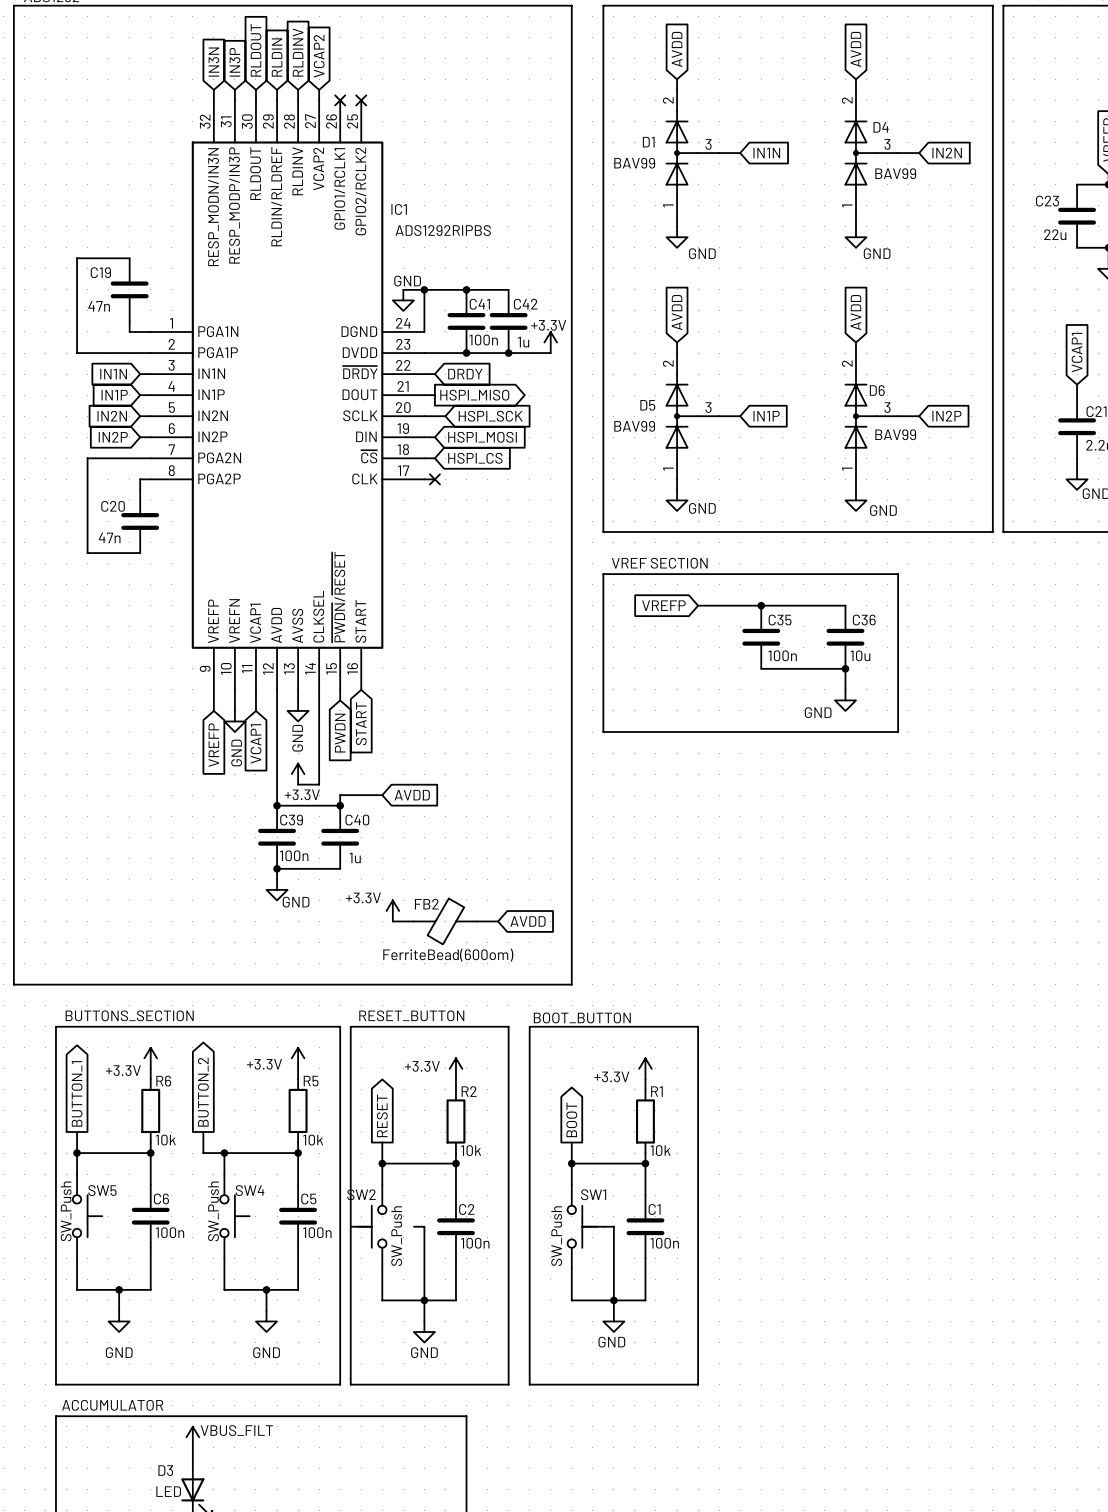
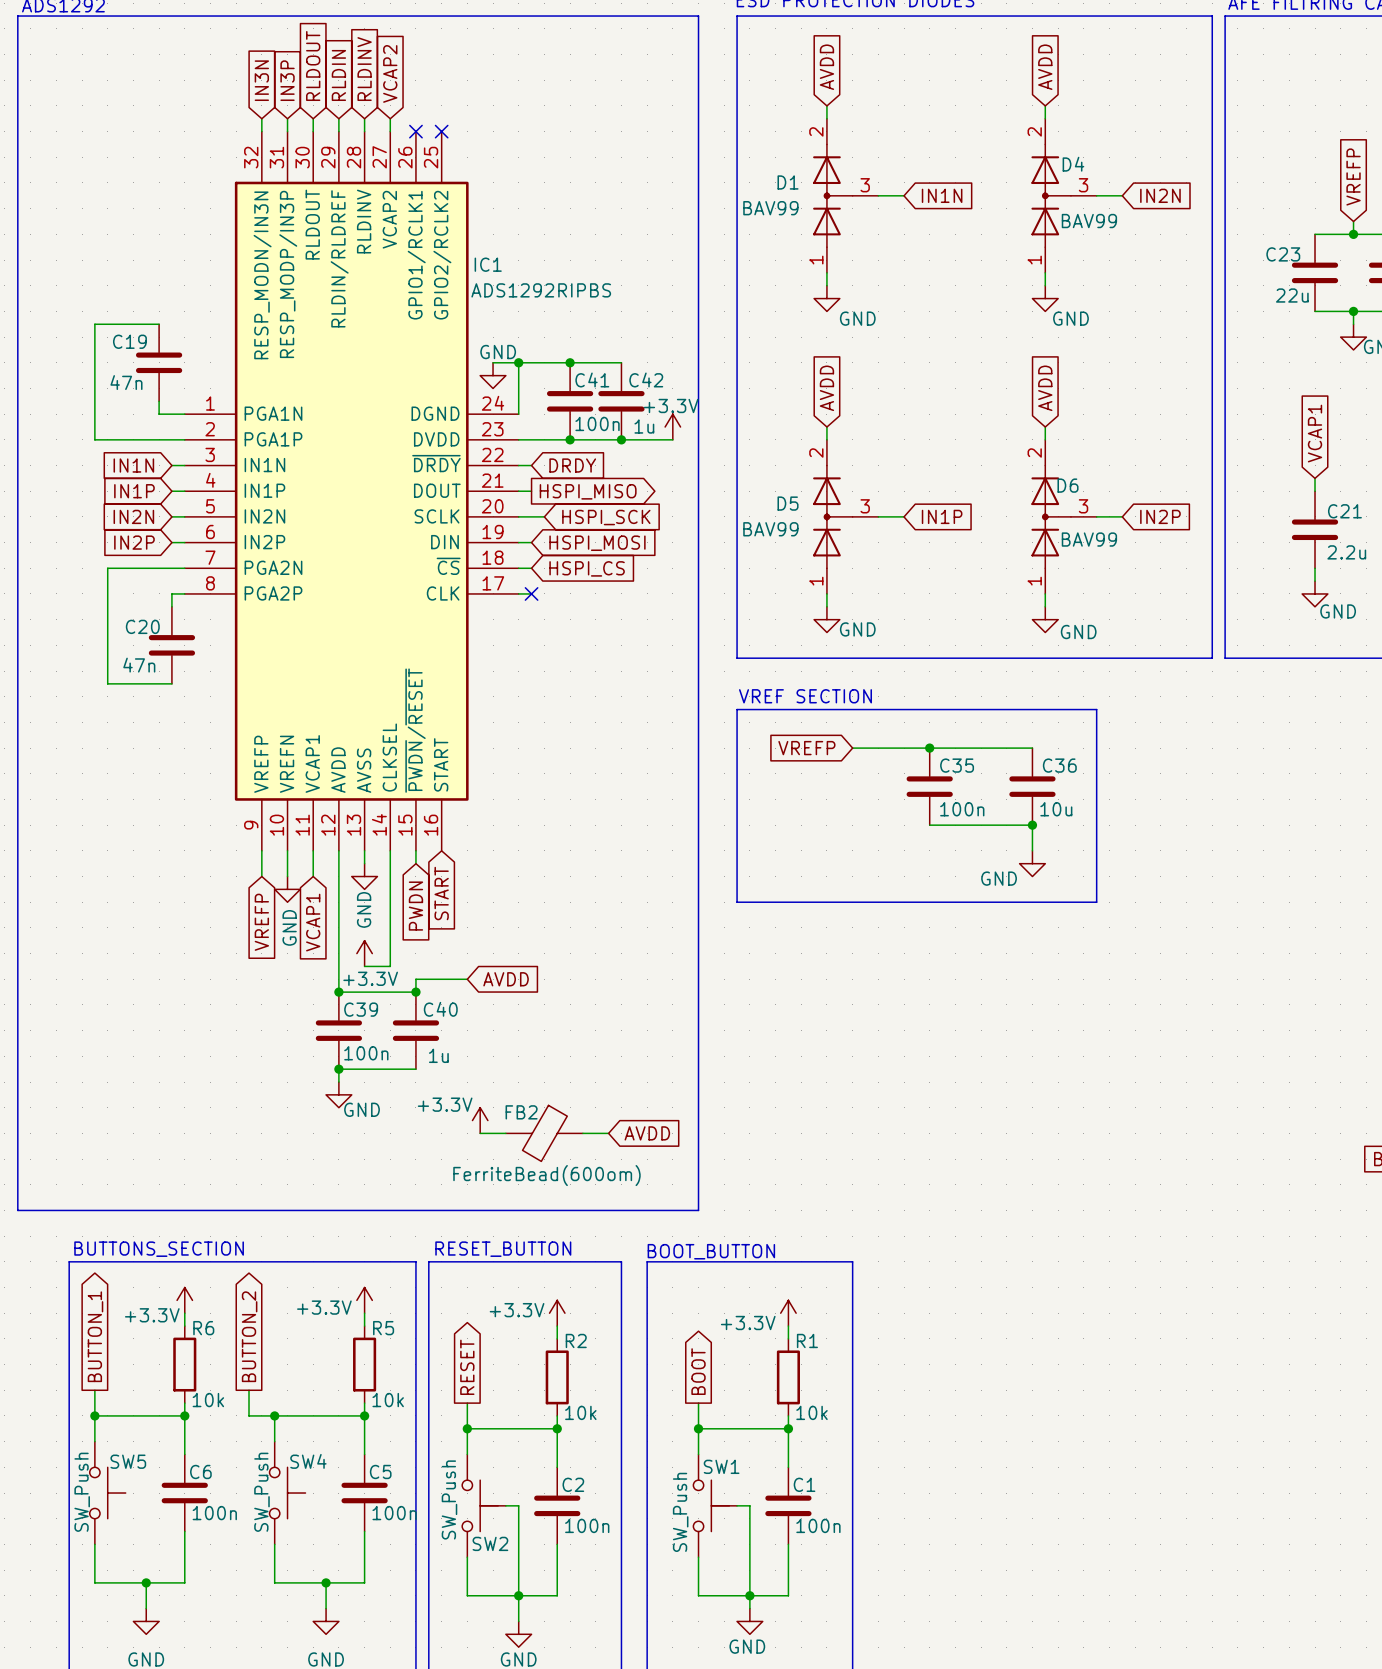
SW2 rotation: 0° (371, 1226) -> 180° (480, 1505)

